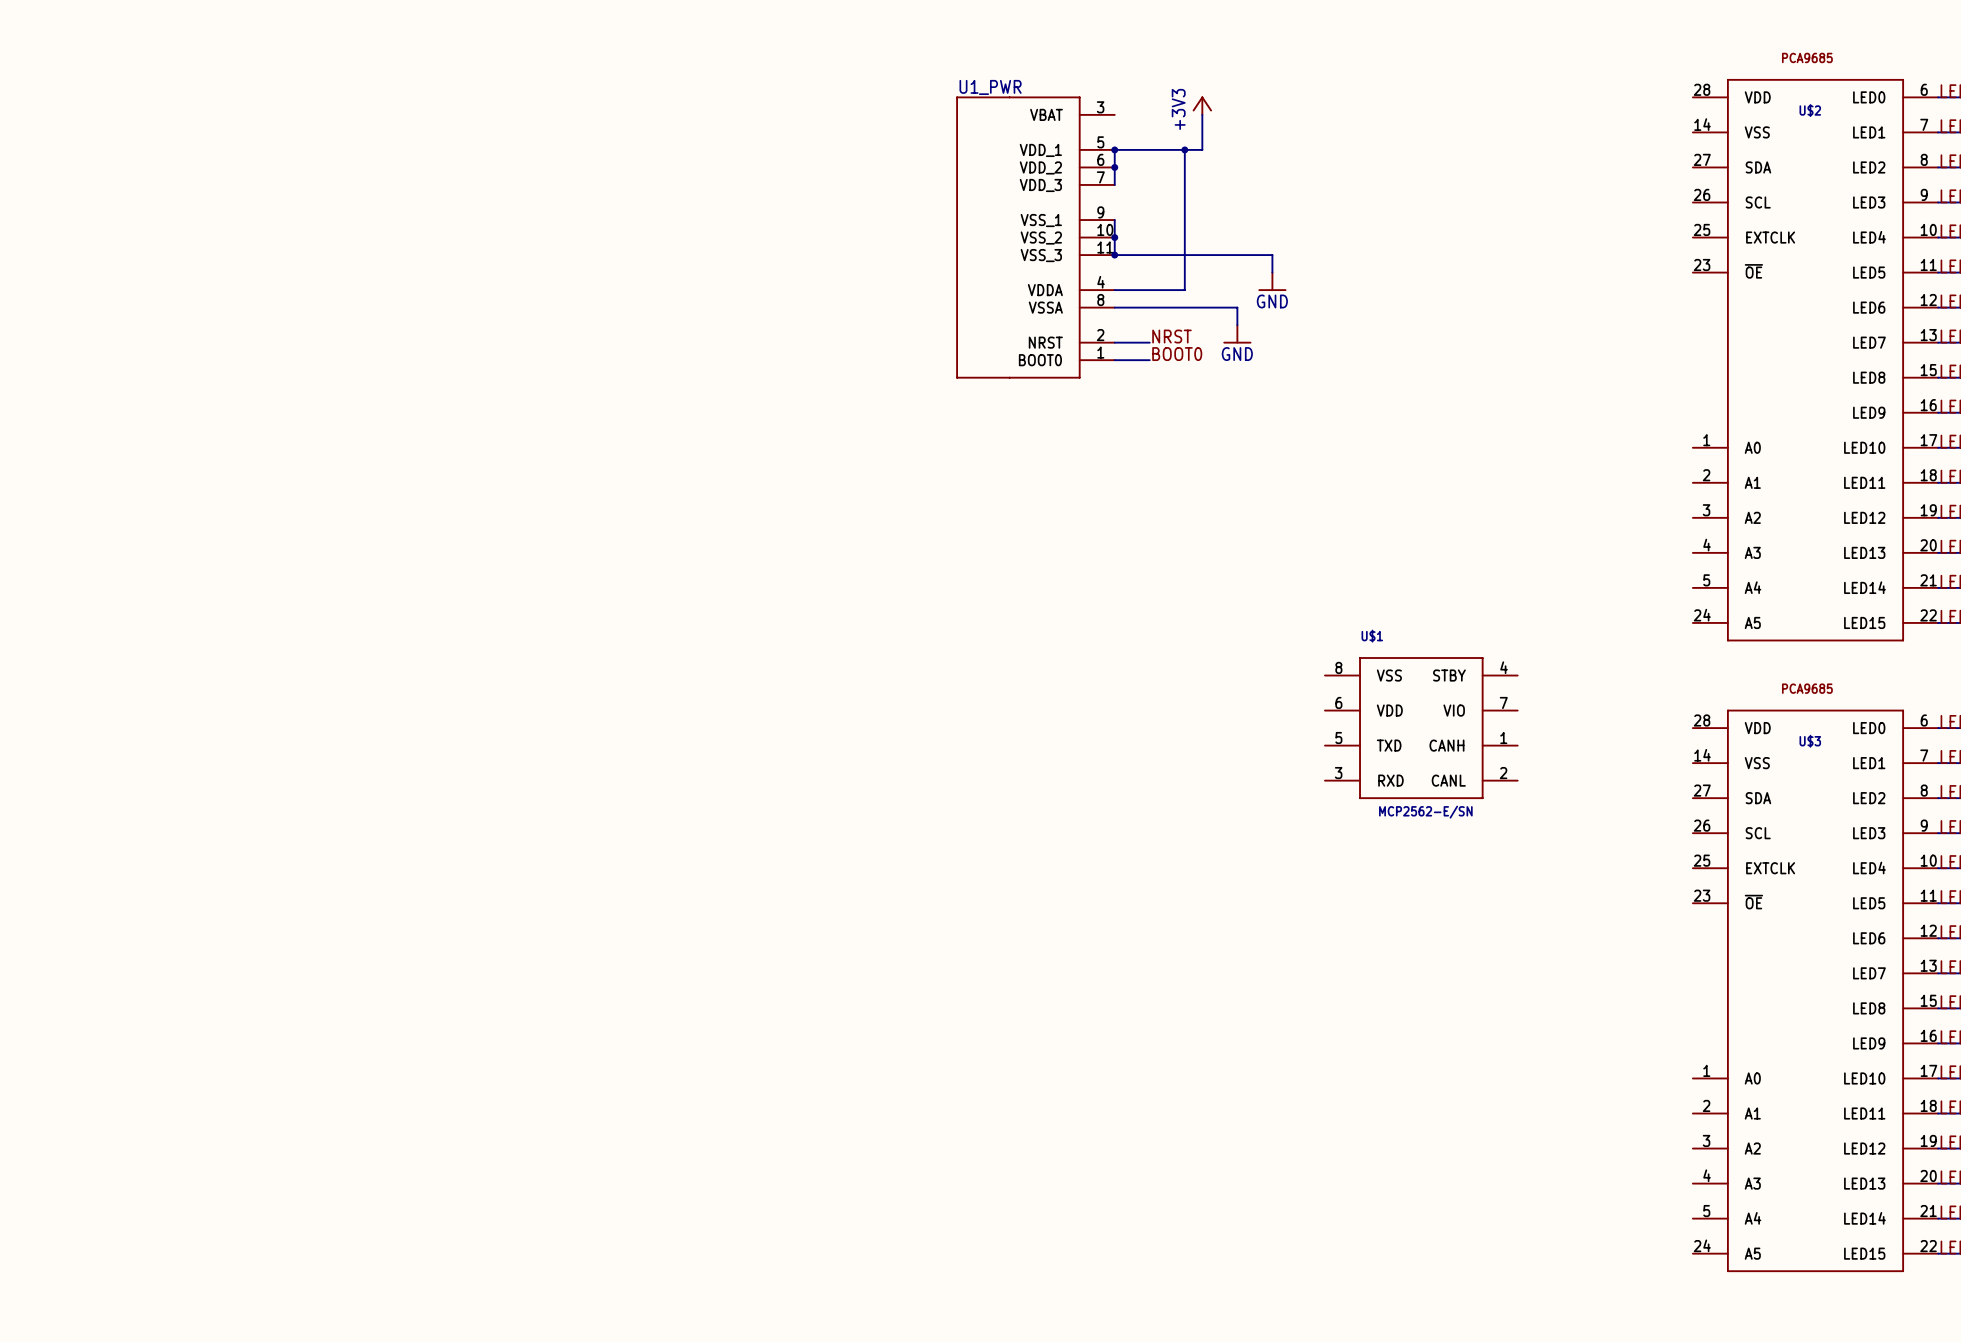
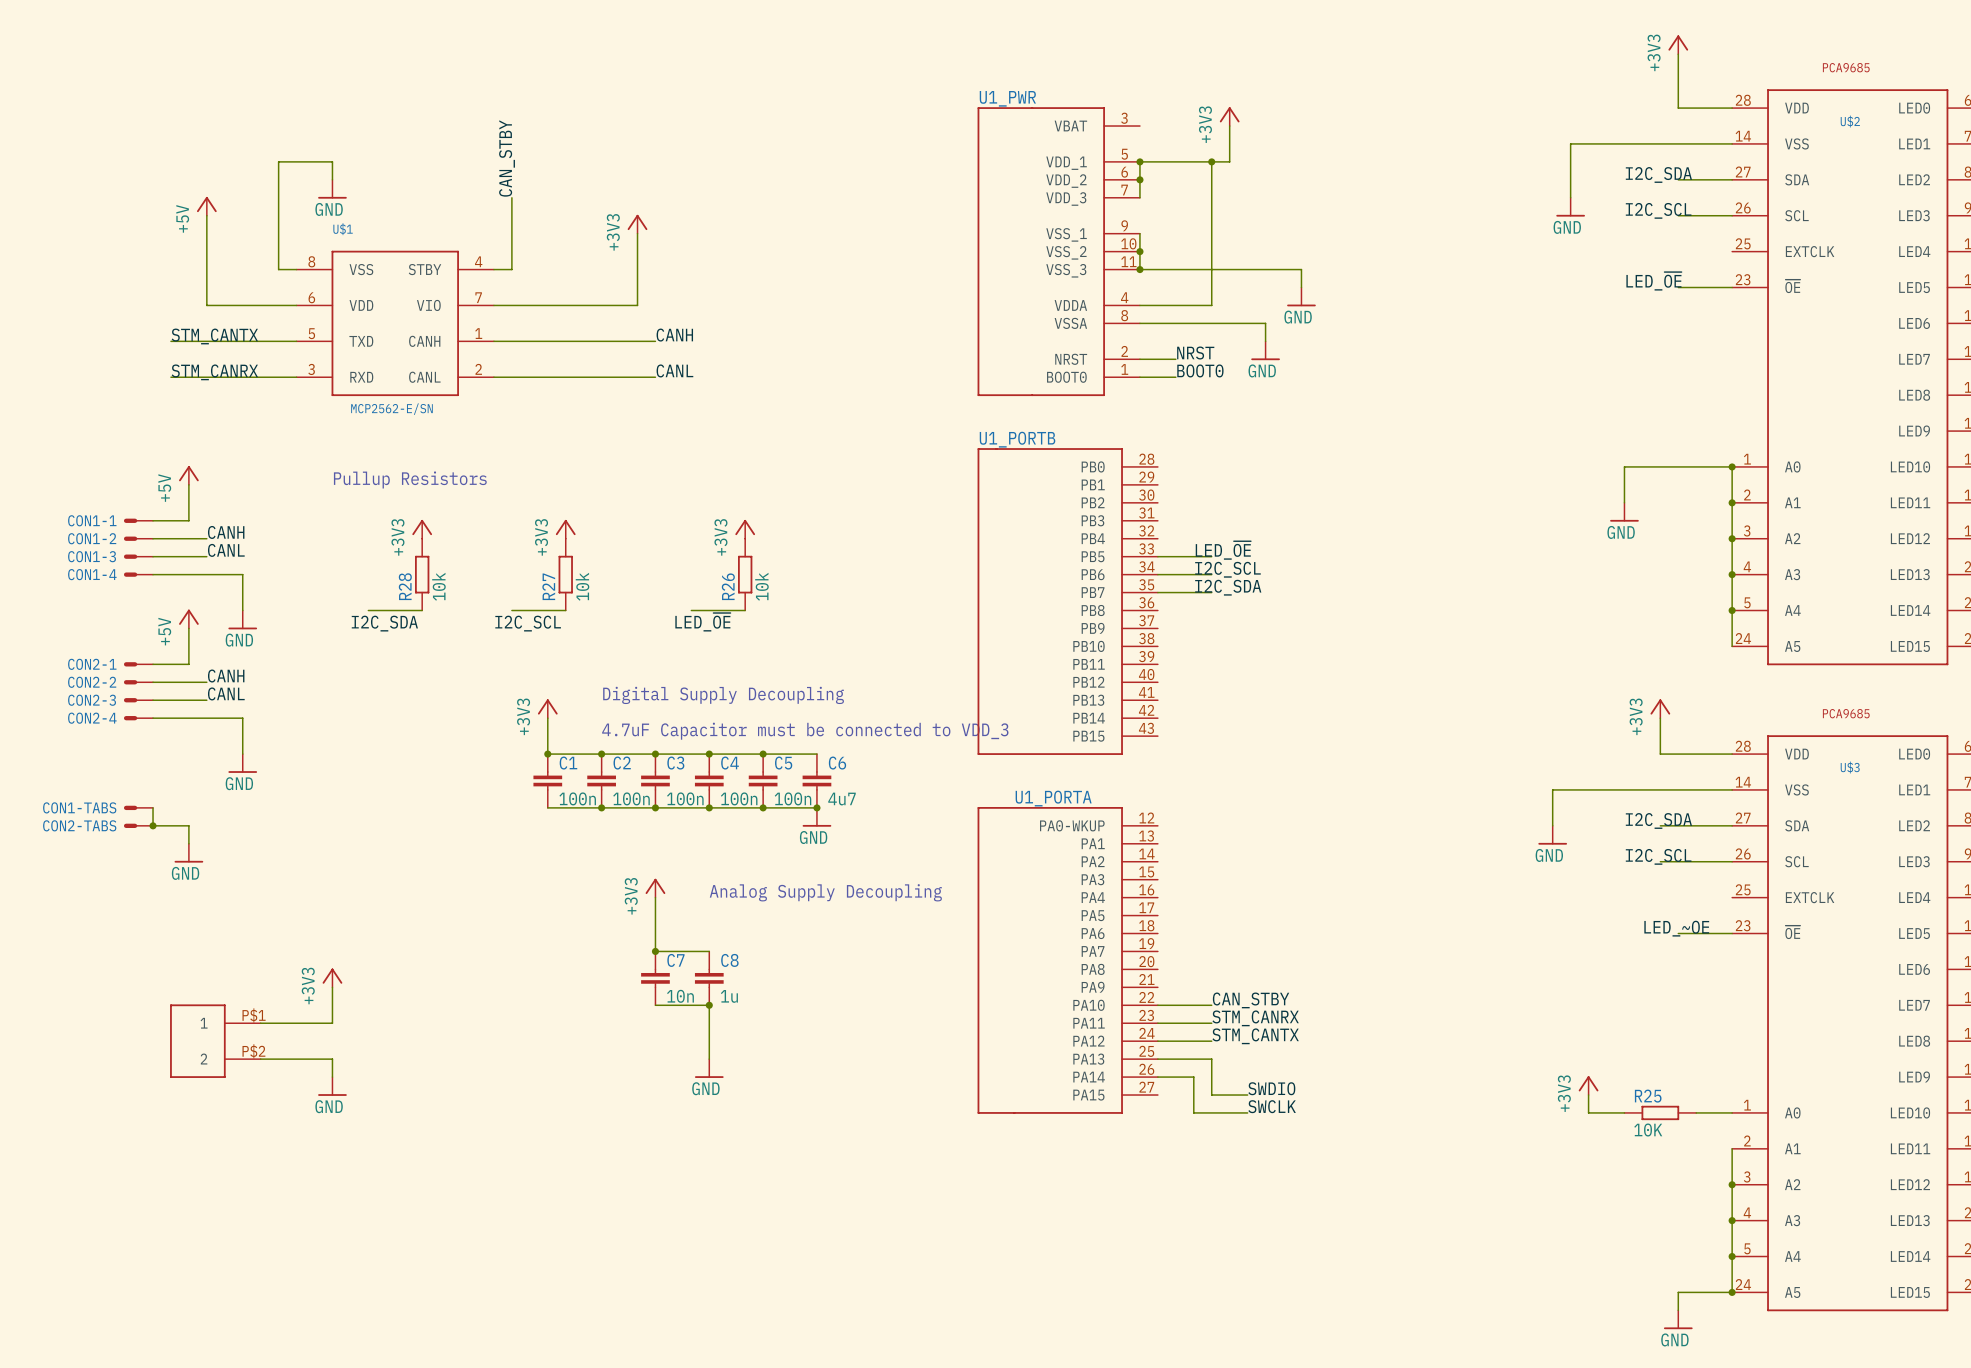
power symbol: none -> +3V3 (1678, 44)
wire: none -> (1678, 54) (1678, 108) (1732, 108)
wire: none -> (1732, 143) (1570, 143) (1570, 197)
label: none -> CAN_STBY (507, 158)
label: none -> I2C_SDA (1658, 174)
wire: none -> (332, 179) (332, 161) (278, 161) (278, 269) (296, 269)
wire: none -> (1678, 179) (1732, 179)
power symbol: none -> GND (332, 189)
wire: none -> (511, 197) (511, 269) (493, 269)
power symbol: none -> +5V (206, 206)
power symbol: none -> GND (1570, 207)
label: none -> I2C_SCL (1658, 210)
wire: none -> (206, 215) (206, 305) (296, 305)
wire: none -> (1678, 215) (1732, 215)
power symbol: none -> +3V3 (637, 224)
wire: none -> (637, 233) (637, 305) (493, 305)
label: none -> LED_~{OE} (1654, 281)
wire: none -> (1678, 287) (1732, 287)
label: none -> STM_CANTX (214, 336)
label: none -> CANH (674, 335)
wire: none -> (170, 341) (296, 341)
wire: none -> (493, 341) (655, 341)
label: none -> STM_CANRX (214, 372)
label: none -> CANL (674, 370)
wire: none -> (170, 377) (296, 377)
wire: none -> (493, 377) (655, 377)
junction: none -> (1732, 466)
power symbol: none -> +5V (188, 475)
text: none -> Pullup Resistors (410, 479)
wire: none -> (188, 484) (188, 520) (153, 520)
wire: none -> (1624, 502) (1624, 466) (1732, 466) (1732, 646)
junction: none -> (1732, 502)
power symbol: none -> GND (1624, 512)
CON1-1: none -> (138, 520)
power symbol: none -> +3V3 (422, 529)
power symbol: none -> +3V3 (565, 529)
power symbol: none -> +3V3 (745, 529)
label: none -> CANH (226, 532)
CON1-2: none -> (138, 538)
wire: none -> (153, 538) (206, 538)
junction: none -> (1732, 538)
label: none -> LED_~{OE} (1223, 550)
label: none -> CANL (226, 550)
CON1-3: none -> (138, 556)
wire: none -> (153, 556) (206, 556)
wire: none -> (1157, 556) (1211, 556)
label: none -> I2C_SCL (1227, 569)
CON1-4: none -> (138, 574)
wire: none -> (153, 574) (242, 574) (242, 610)
R28: none -> 10k (422, 574)
R27: none -> 10k (565, 574)
R26: none -> 10k (745, 574)
wire: none -> (1157, 574) (1211, 574)
junction: none -> (1732, 574)
label: none -> I2C_SDA (1228, 587)
wire: none -> (1157, 592) (1211, 592)
U1_PORTB: none -> (1067, 601)
wire: none -> (368, 610) (422, 610)
wire: none -> (511, 610) (565, 610)
wire: none -> (691, 610) (745, 610)
junction: none -> (1732, 610)
power symbol: none -> +5V (188, 619)
power symbol: none -> GND (242, 619)
label: none -> LED_~{OE} (702, 622)
label: none -> I2C_SDA (384, 623)
label: none -> I2C_SCL (528, 623)
wire: none -> (188, 628) (188, 664) (153, 664)
CON2-1: none -> (138, 664)
label: none -> CANH (226, 676)
CON2-2: none -> (138, 682)
wire: none -> (153, 682) (206, 682)
label: none -> CANL (226, 693)
text: none -> Digital Supply Decoupling (723, 695)
CON2-3: none -> (138, 700)
wire: none -> (153, 700) (206, 700)
power symbol: none -> +3V3 (547, 708)
power symbol: none -> +3V3 (1660, 708)
CON2-4: none -> (138, 718)
wire: none -> (153, 718) (242, 718) (242, 754)
wire: none -> (547, 718) (547, 754) (816, 754)
wire: none -> (1660, 718) (1660, 754) (1732, 754)
text: none -> 4.7uF Capacitor must be connected to VDD_3 (805, 731)
junction: none -> (547, 754)
junction: none -> (601, 754)
junction: none -> (655, 754)
junction: none -> (709, 754)
junction: none -> (763, 754)
U$1 position: (1421, 728) -> (395, 323)
power symbol: none -> GND (242, 763)
C1: none -> 100n (547, 780)
C2: none -> 100n (601, 780)
C3: none -> 100n (655, 780)
C4: none -> 100n (709, 780)
C5: none -> 100n (763, 780)
C6: none -> 4u7 (816, 780)
wire: none -> (1732, 789) (1552, 789) (1552, 825)
CON1-TABS: none -> (138, 807)
wire: none -> (153, 807) (153, 825) (188, 825) (188, 843)
wire: none -> (547, 807) (816, 807)
junction: none -> (601, 807)
junction: none -> (655, 807)
junction: none -> (709, 807)
junction: none -> (763, 807)
junction: none -> (816, 807)
power symbol: none -> GND (816, 817)
label: none -> I2C_SDA (1658, 820)
CON2-TABS: none -> (138, 825)
junction: none -> (153, 825)
wire: none -> (1660, 825) (1732, 825)
power symbol: none -> GND (1552, 835)
power symbol: none -> GND (188, 853)
label: none -> I2C_SCL (1658, 856)
wire: none -> (1660, 861) (1732, 861)
power symbol: none -> +3V3 (655, 888)
text: none -> Analog Supply Decoupling (825, 892)
wire: none -> (655, 897) (655, 951) (709, 951)
label: none -> LED_~OE (1676, 928)
wire: none -> (1678, 933) (1732, 933)
junction: none -> (655, 951)
U1_PORTA: none -> (1067, 960)
power symbol: none -> +3V3 (332, 977)
C7: none -> 10n (655, 978)
C8: none -> 1u (709, 978)
wire: none -> (332, 987) (332, 1023) (260, 1023)
label: none -> CAN_STBY (1251, 1000)
wire: none -> (655, 1005) (709, 1005) (709, 1059)
junction: none -> (709, 1005)
wire: none -> (1157, 1005) (1211, 1005)
label: none -> STM_CANRX (1255, 1018)
wire: none -> (1157, 1023) (1211, 1023)
label: none -> STM_CANTX (1255, 1036)
part: none -> (215, 1041)
wire: none -> (1157, 1041) (1211, 1041)
wire: none -> (260, 1059) (332, 1059) (332, 1077)
wire: none -> (1157, 1059) (1211, 1059) (1211, 1095) (1247, 1095)
power symbol: none -> GND (709, 1068)
wire: none -> (1157, 1077) (1193, 1077) (1193, 1112) (1247, 1112)
power symbol: none -> +3V3 (1588, 1085)
power symbol: none -> GND (332, 1086)
label: none -> SWDIO (1271, 1088)
wire: none -> (1588, 1095) (1588, 1112) (1624, 1112)
label: none -> SWCLK (1272, 1106)
R25: none -> 10K (1660, 1112)
wire: none -> (1696, 1112) (1732, 1112)
wire: none -> (1732, 1148) (1732, 1292) (1678, 1292) (1678, 1310)
junction: none -> (1732, 1184)
junction: none -> (1732, 1220)
junction: none -> (1732, 1256)
junction: none -> (1732, 1292)
power symbol: none -> GND (1678, 1319)

